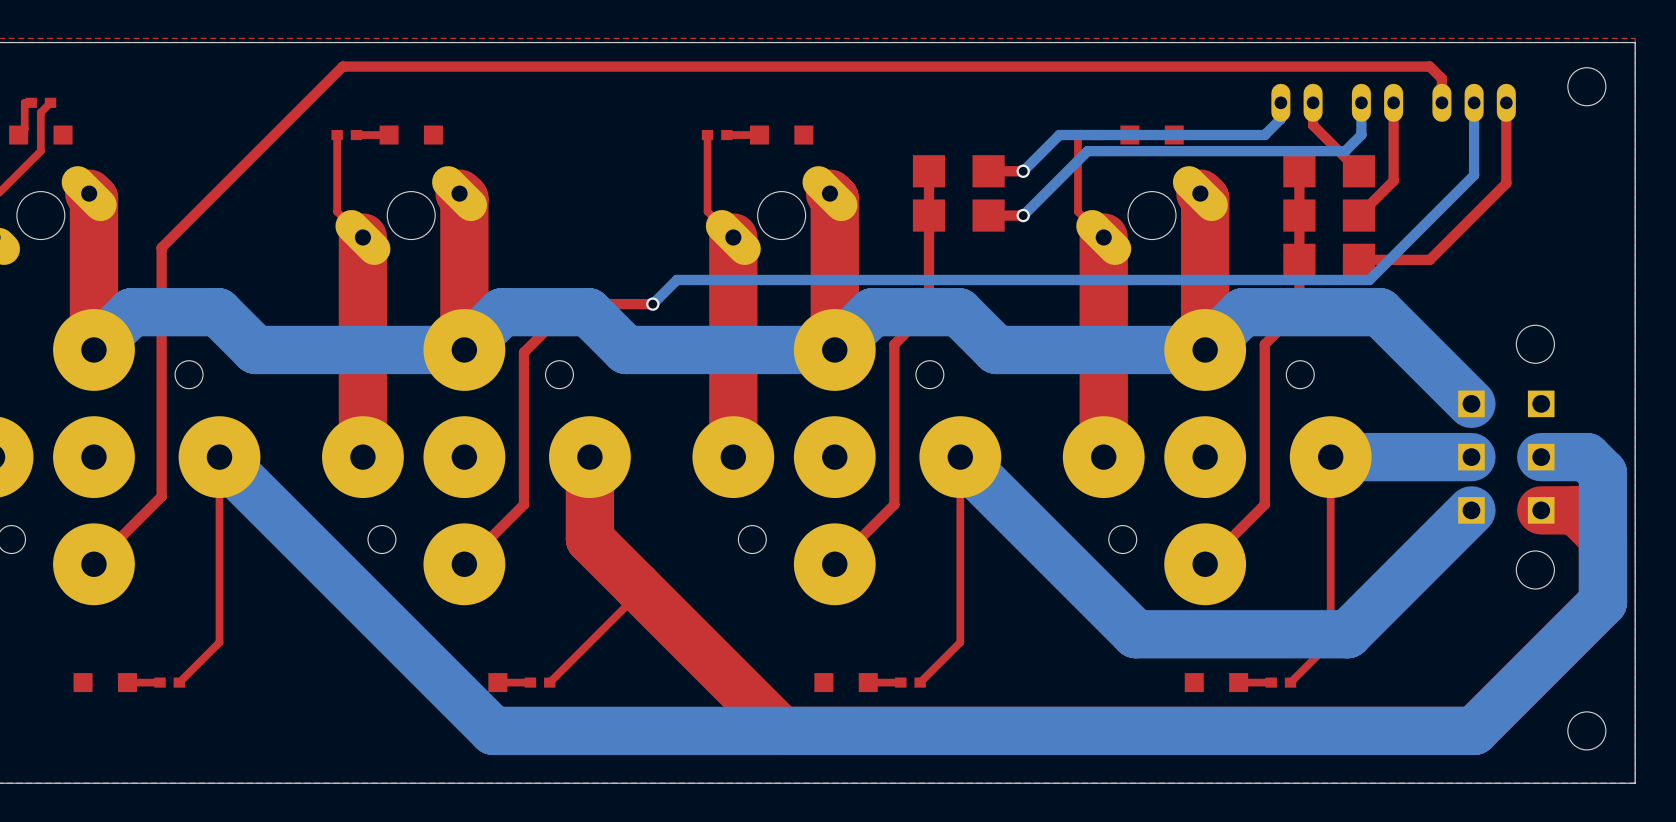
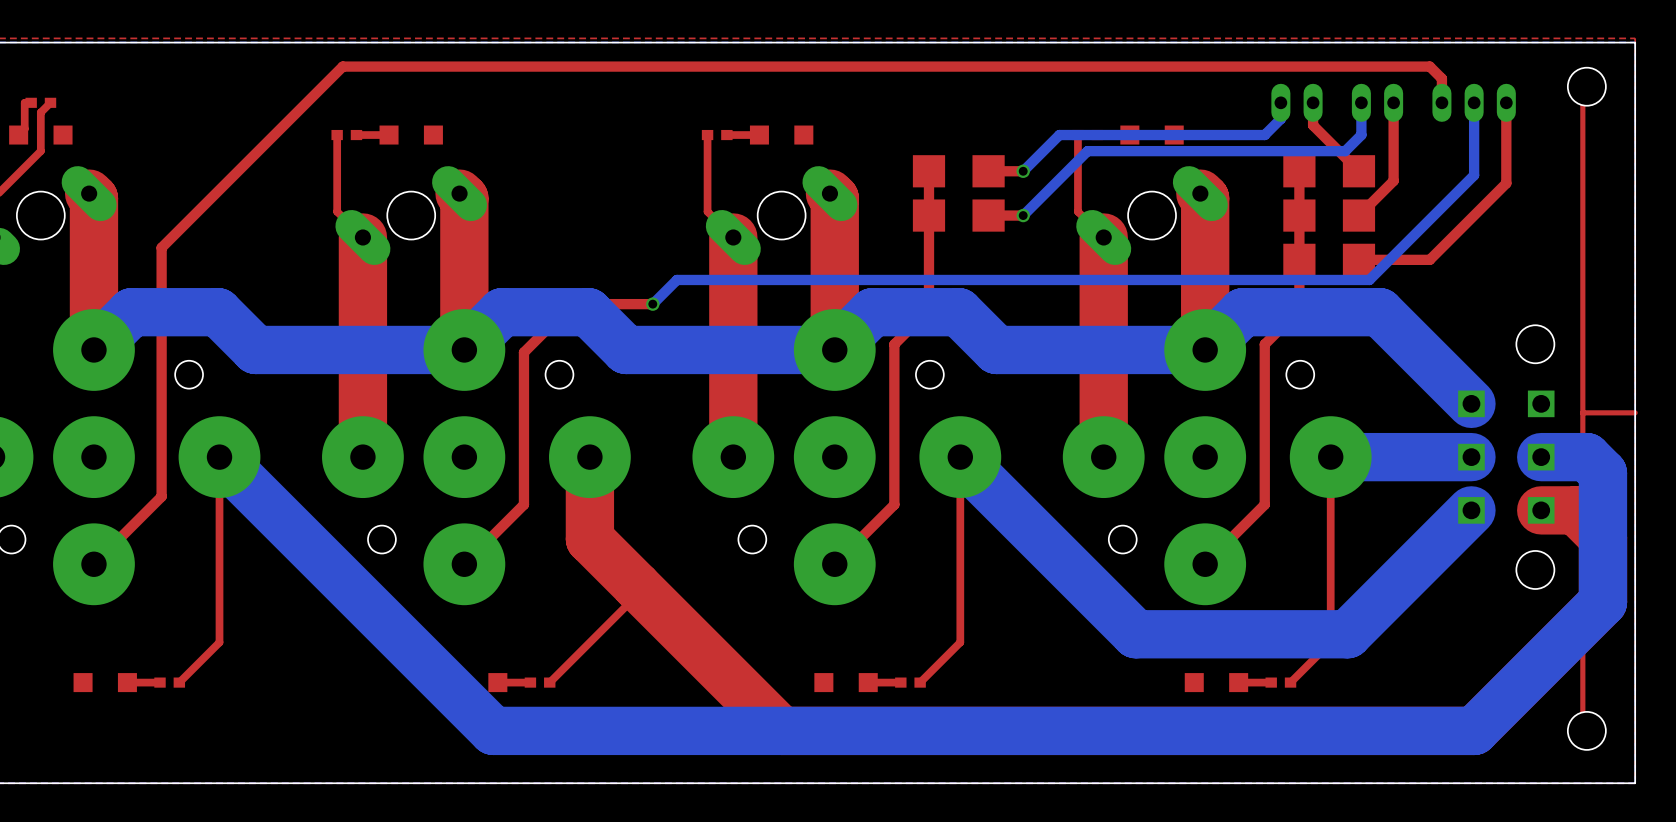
top track: none -> (1582, 94) (1582, 730)
top track: none -> (1635, 412) (1582, 412)

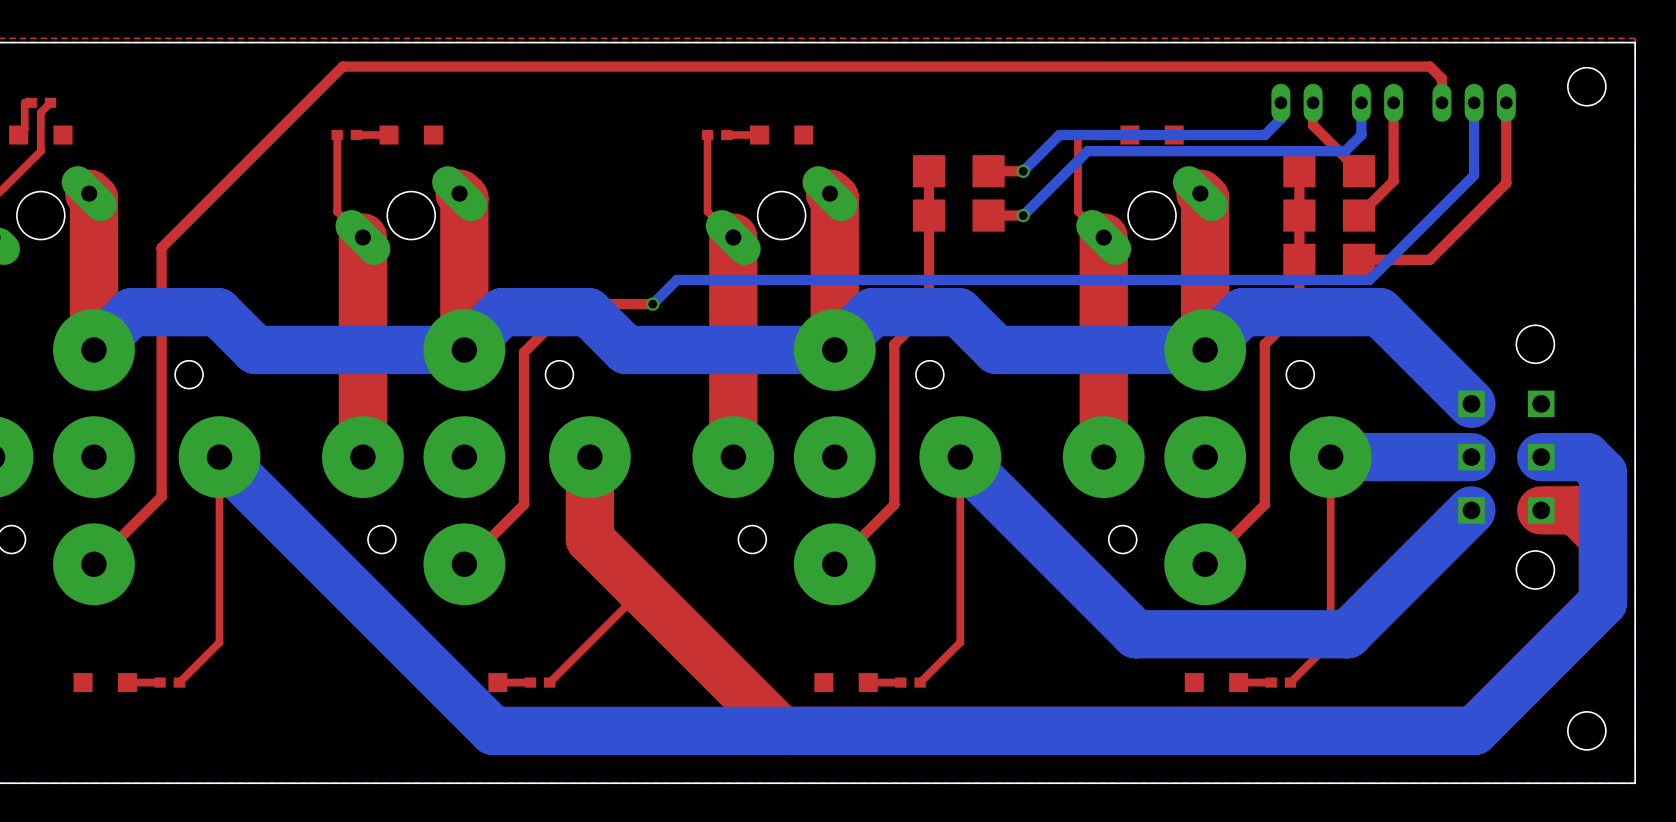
top track: (1582, 94) (1582, 730) -> none
top track: (1635, 412) (1582, 412) -> none

